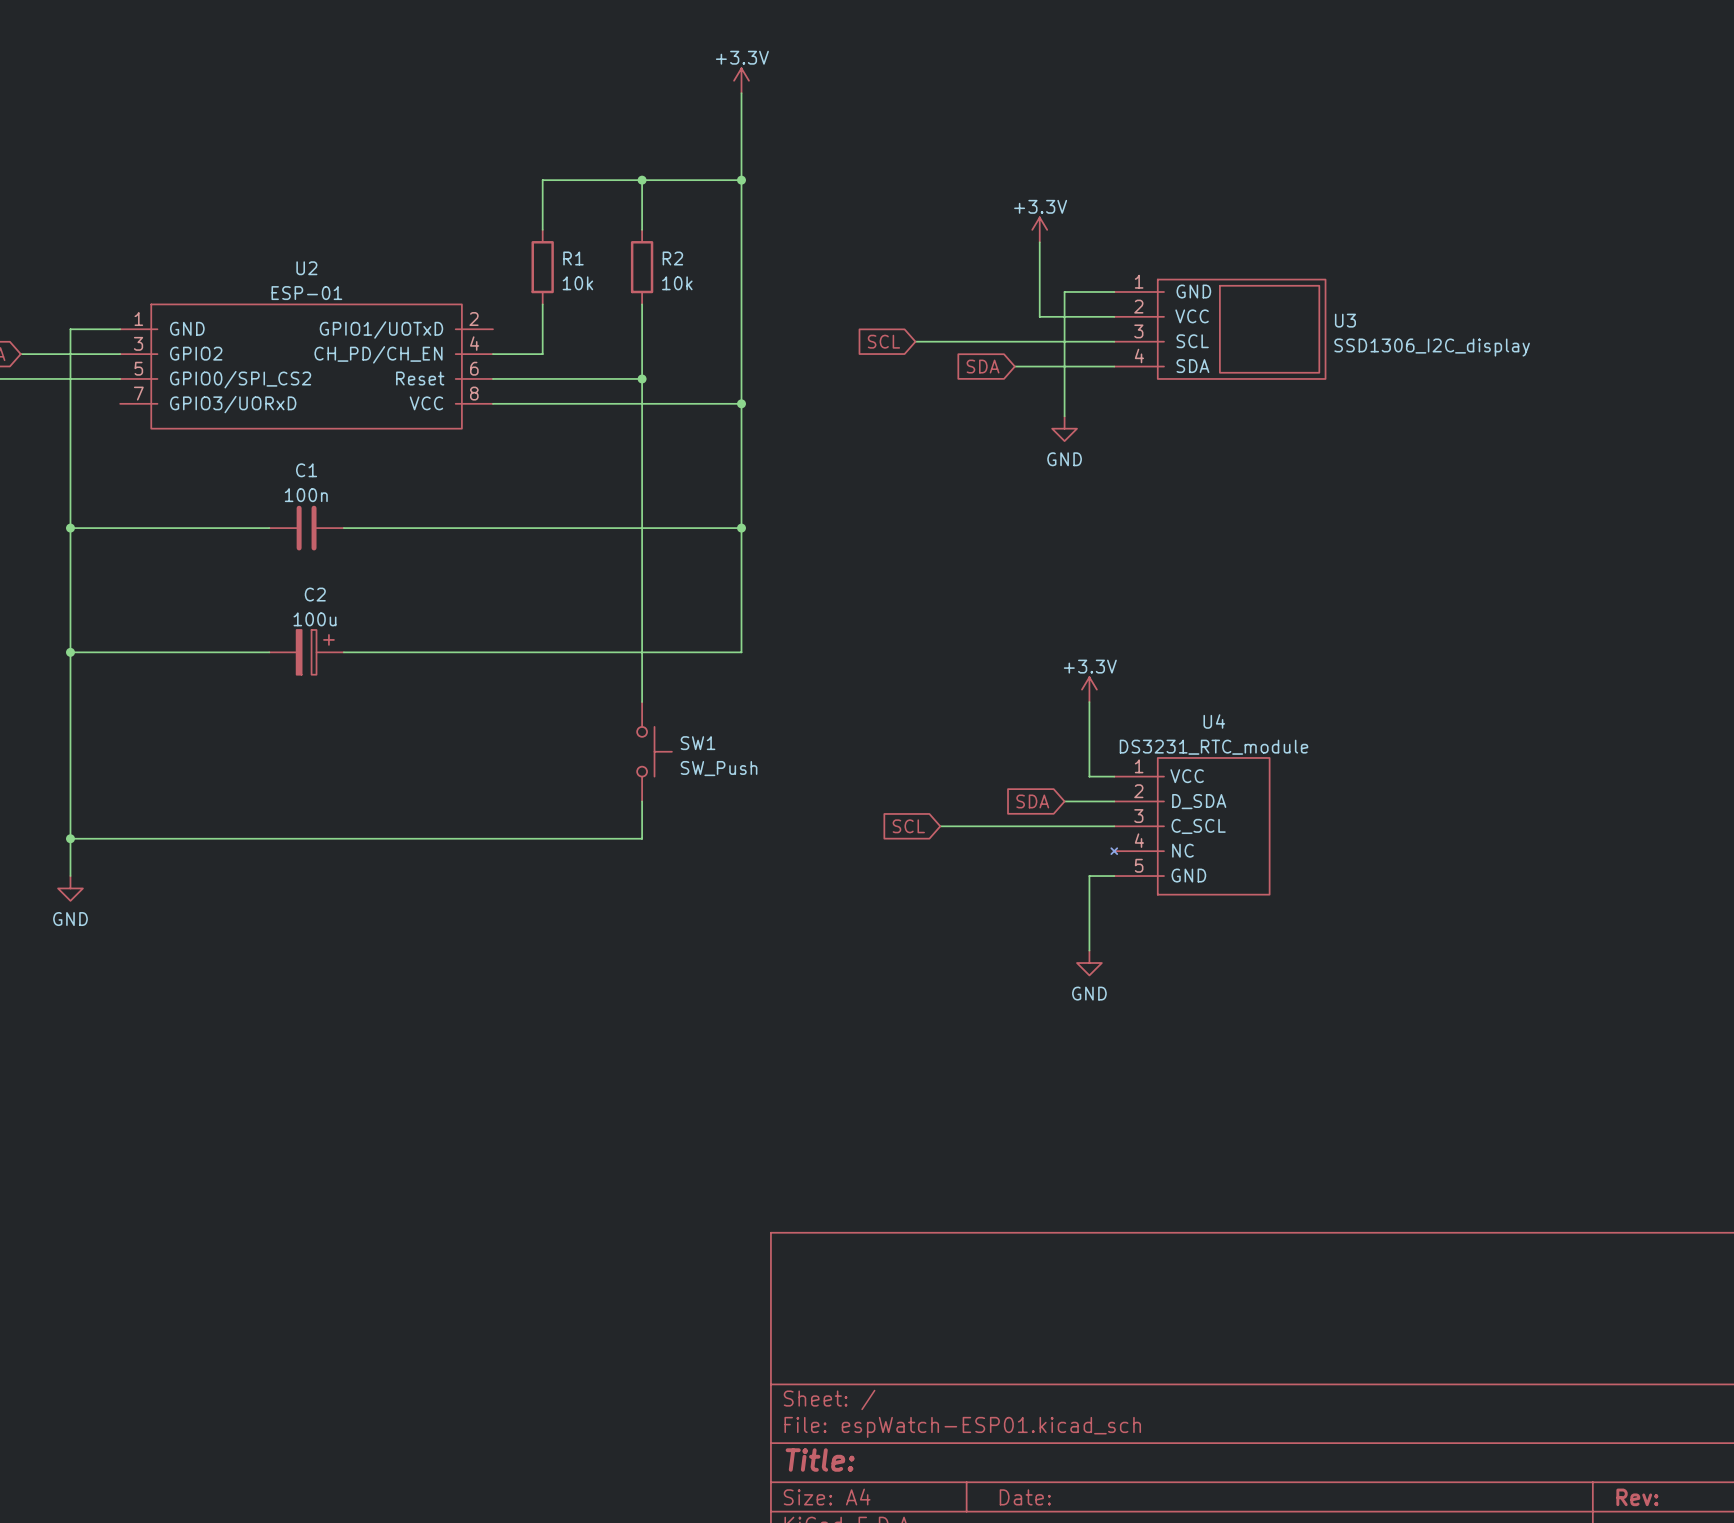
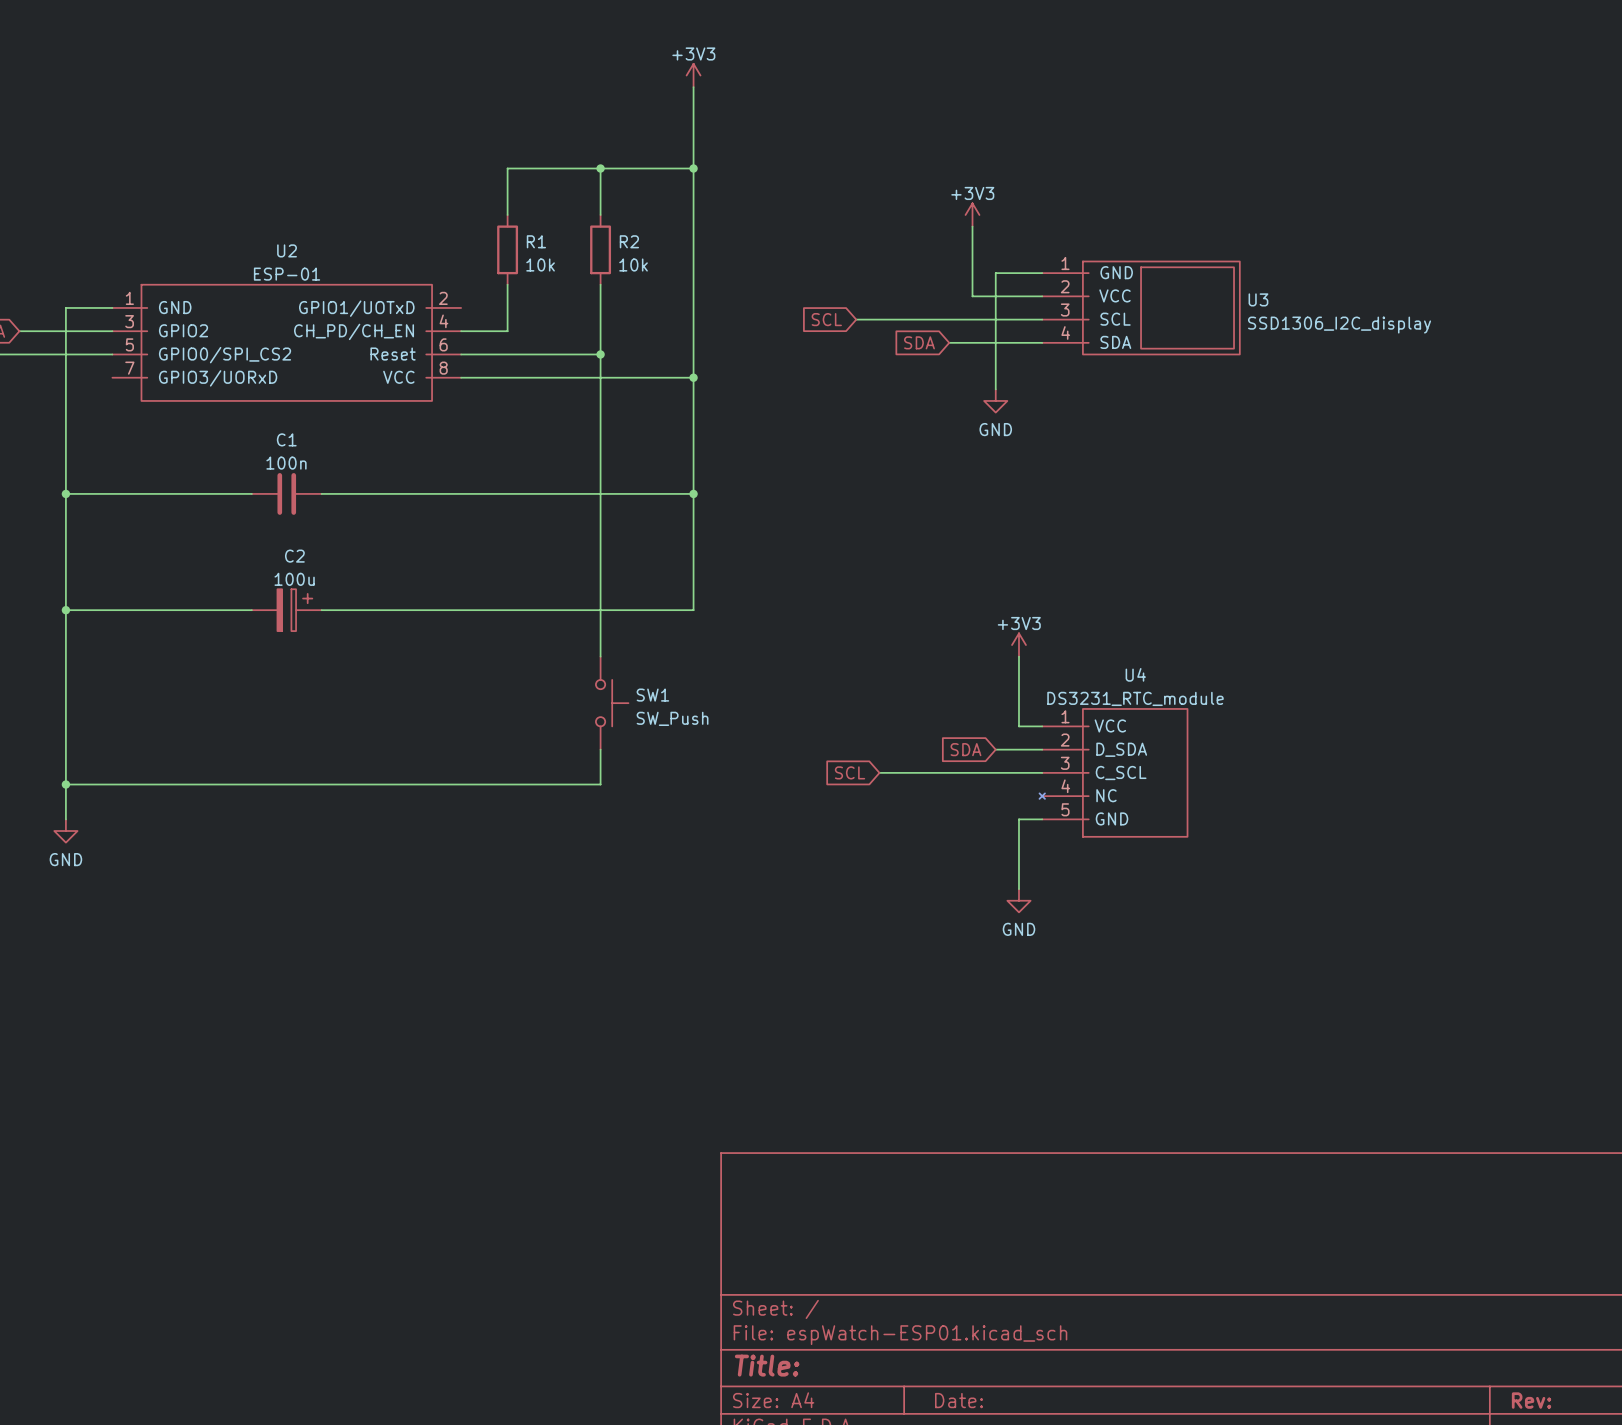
power symbol: +3.3V (741, 80) -> +3V3 (693, 75)
power symbol: +3.3V (1039, 229) -> +3V3 (972, 215)
power symbol: +3.3V (1089, 689) -> +3V3 (1018, 645)

